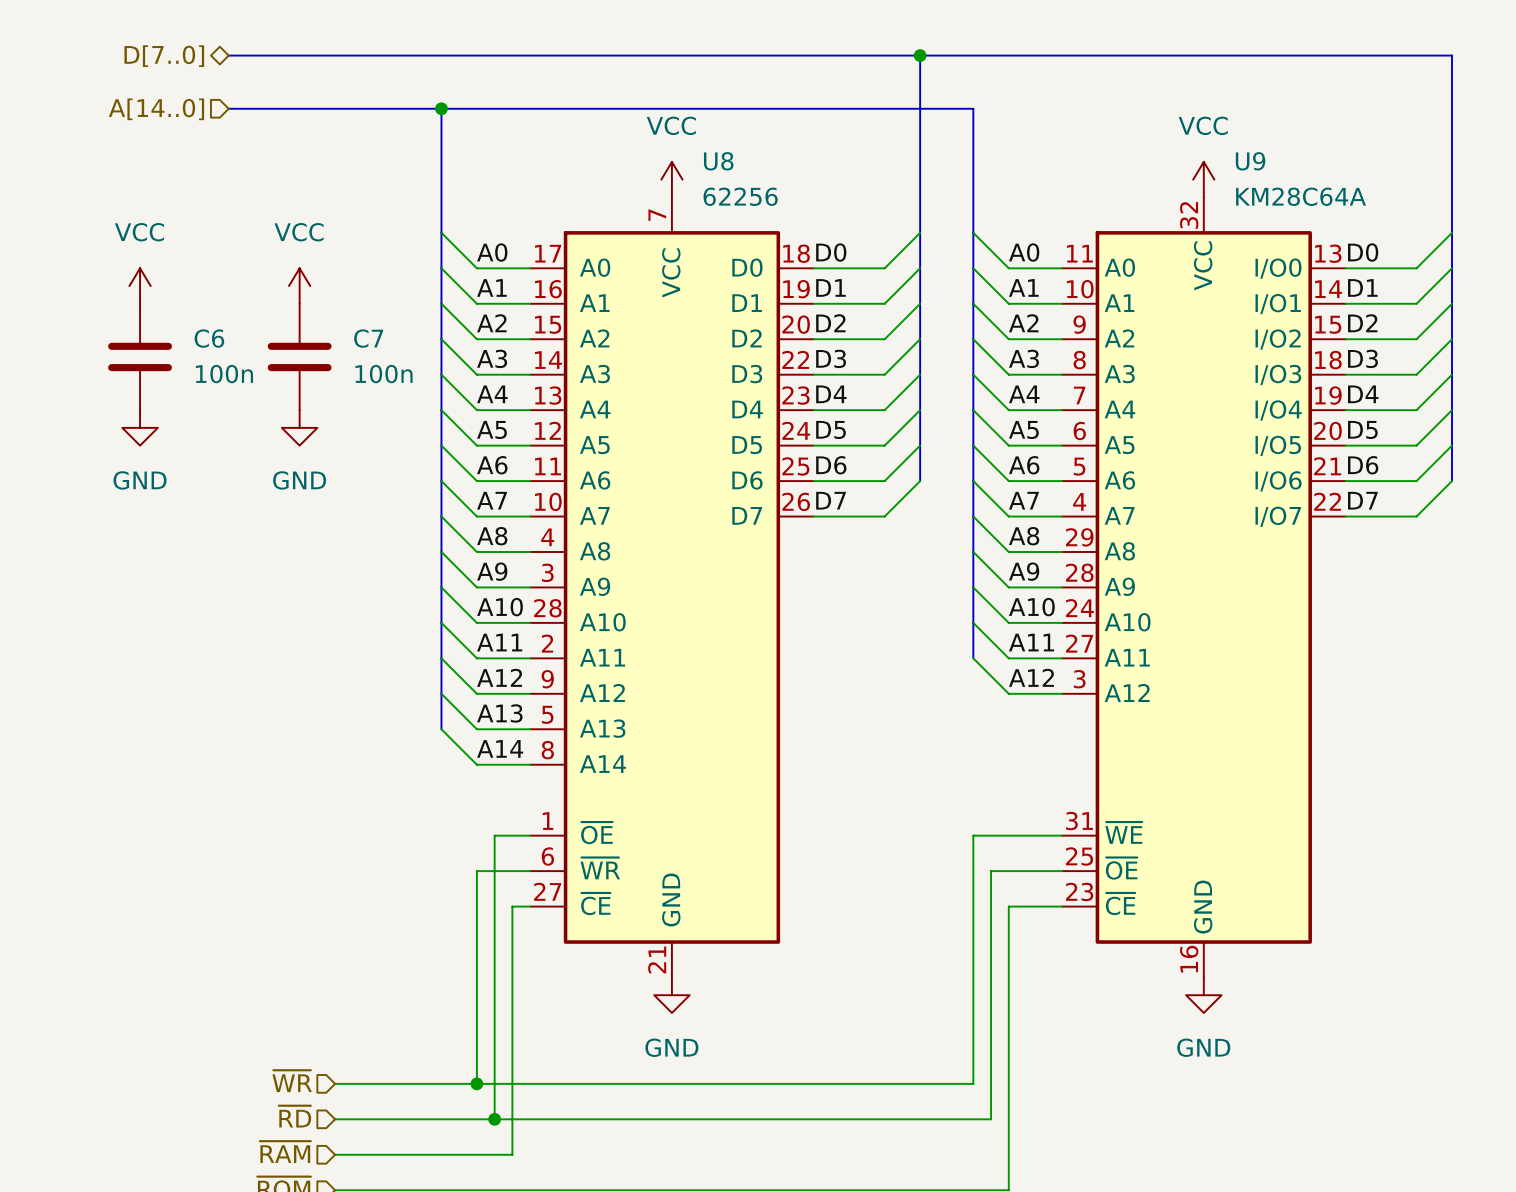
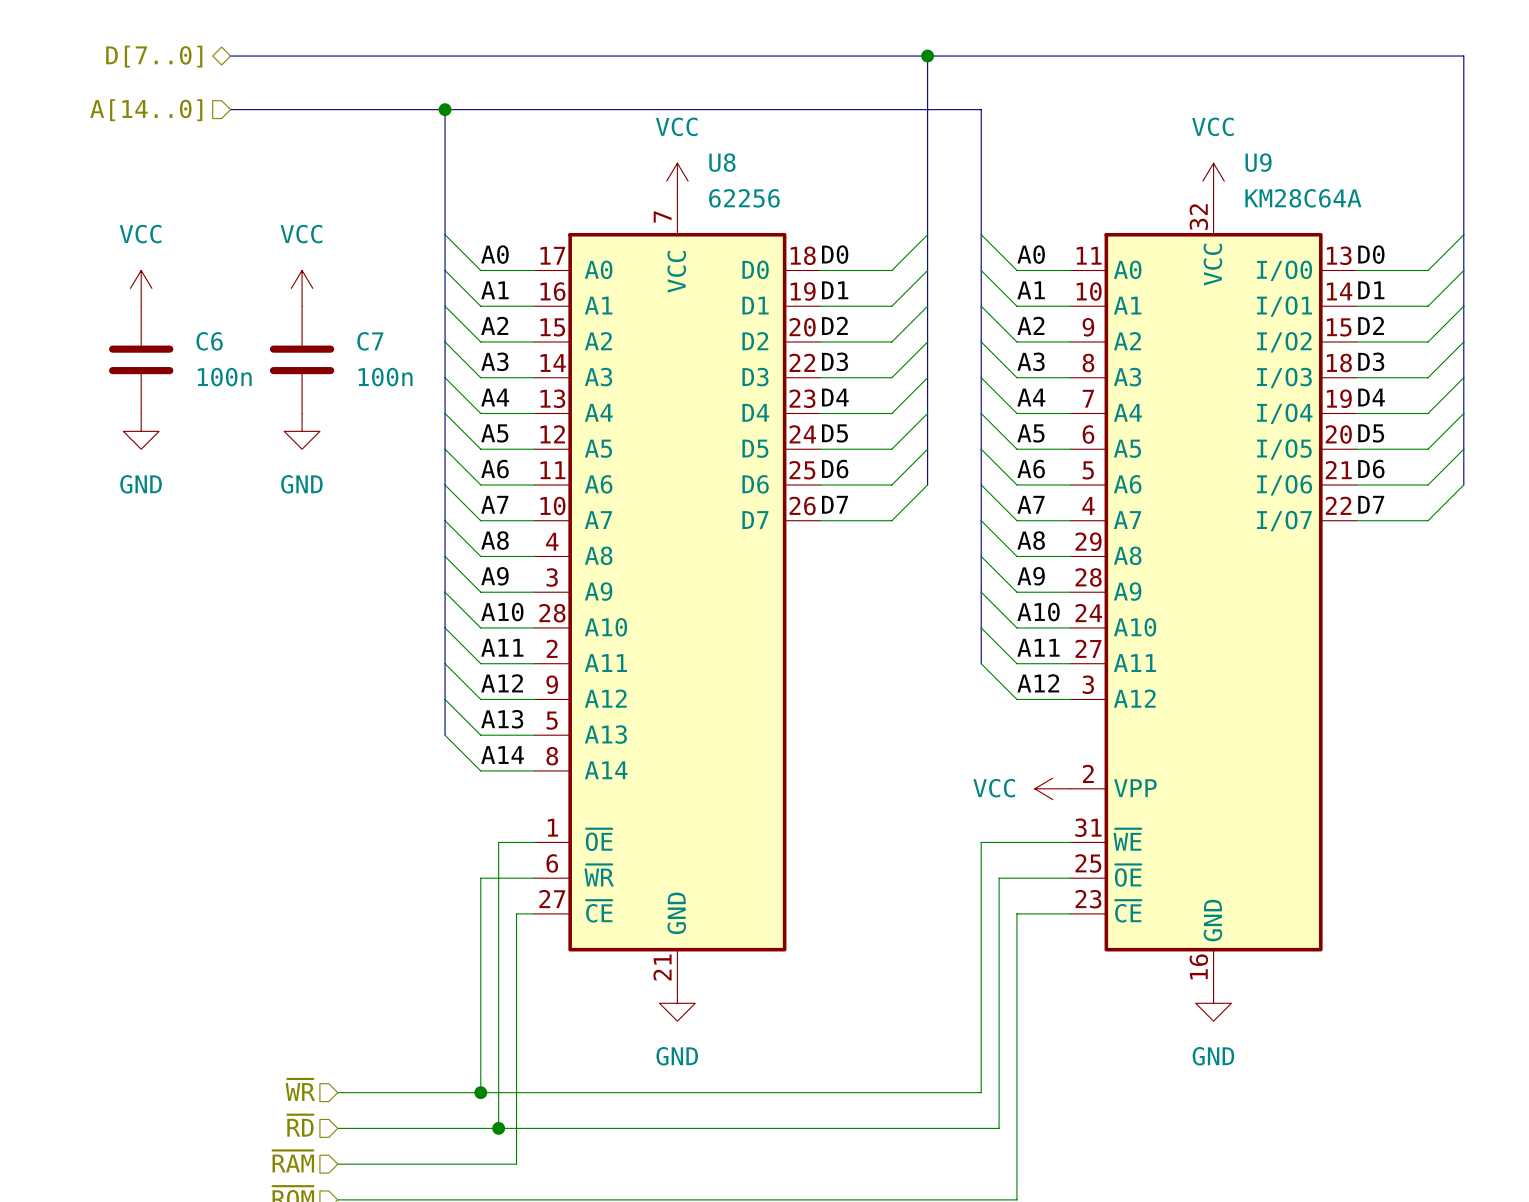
U9 symbol: [1061, 197, 1346, 978] -> [1070, 199, 1357, 986]
power symbol: none -> VCC (1052, 788)

